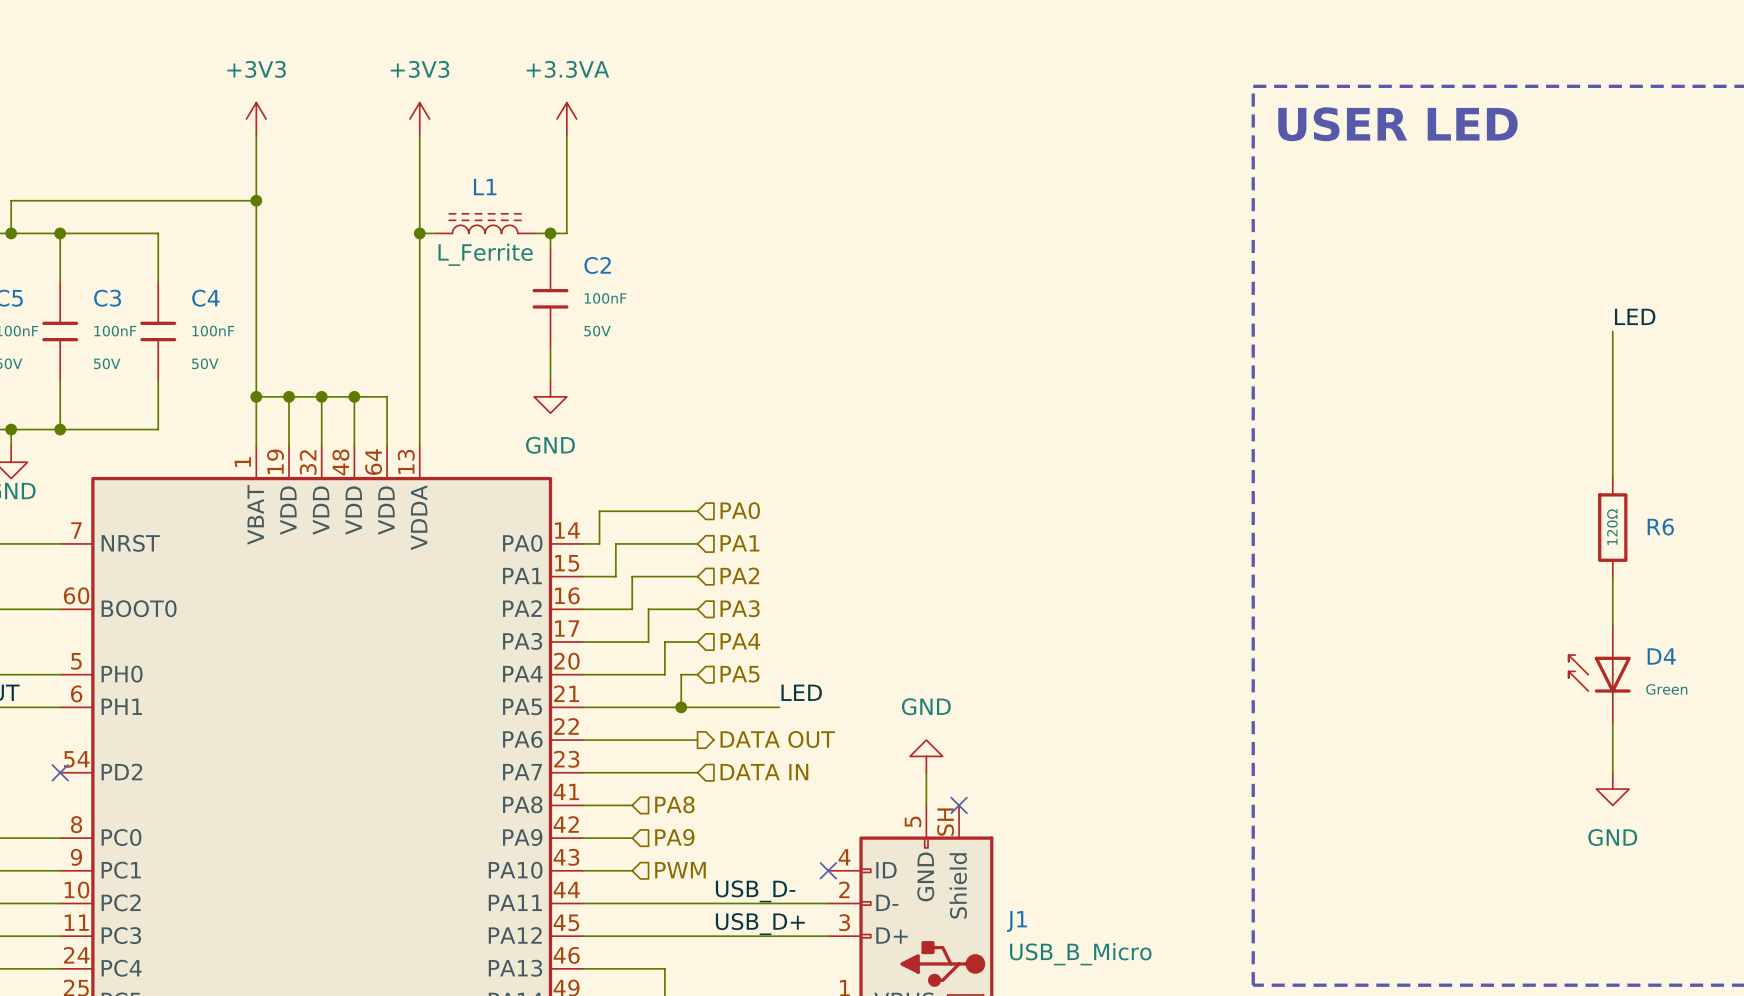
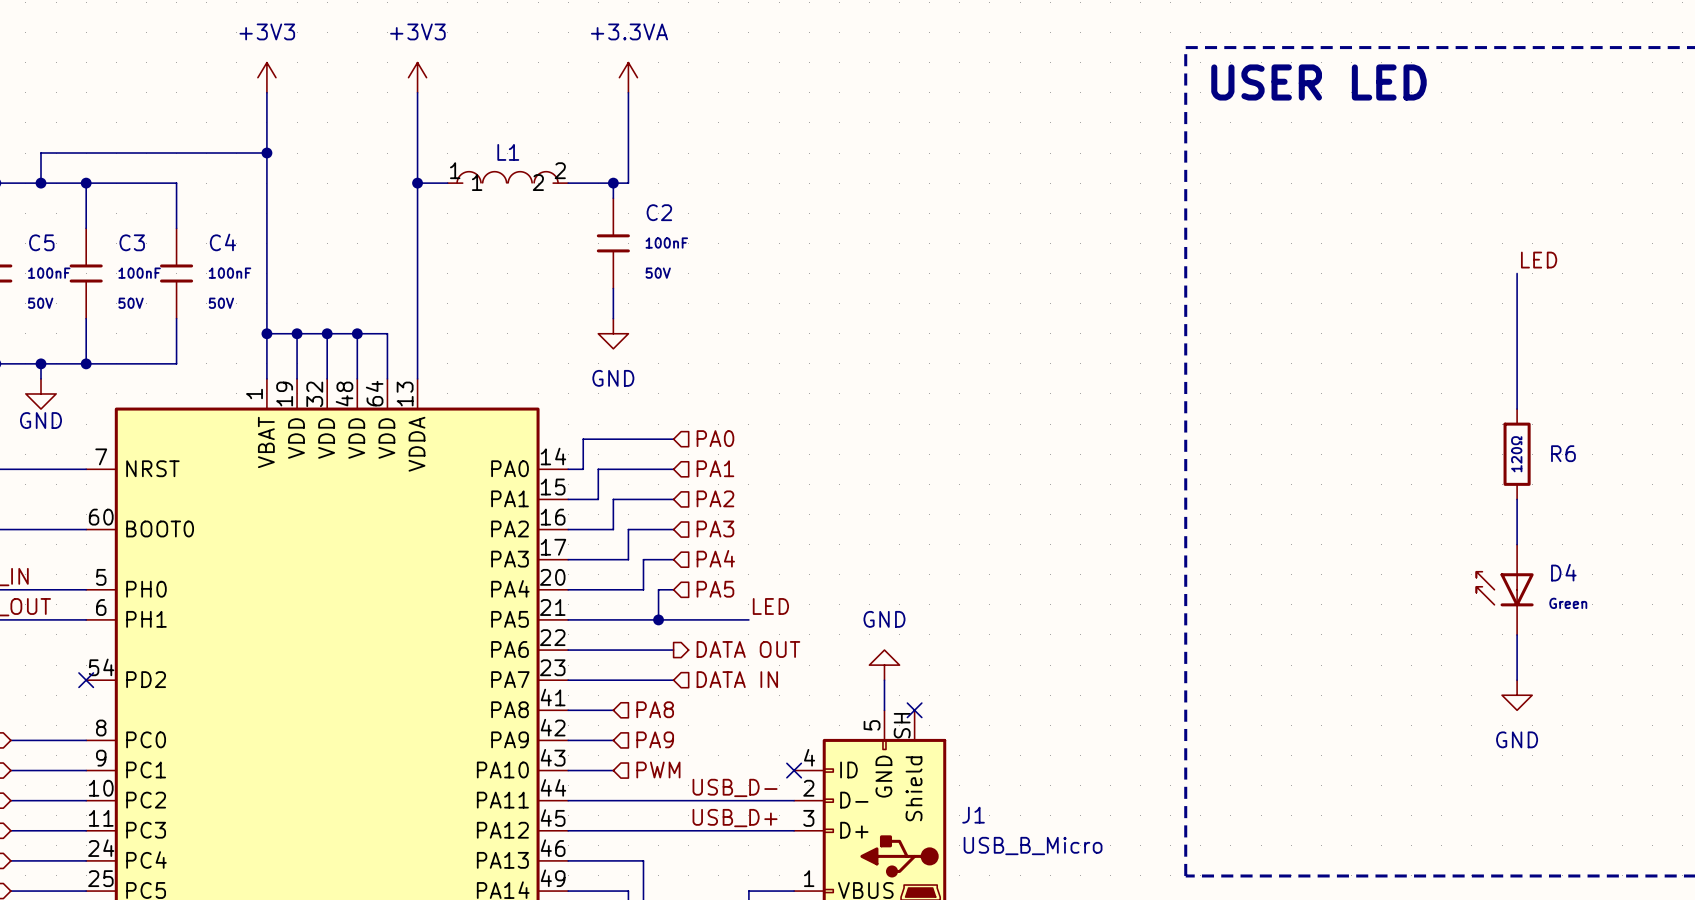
power symbol position: +3.3VA (566, 119) -> +3.3VA (628, 77)
wire: (566, 135) (566, 233) (534, 233) -> none
wire: none -> (628, 92) (628, 183) (568, 183)
L1 symbol: [436, 213, 535, 234] -> [447, 171, 569, 184]
wire: (550, 233) (550, 249) -> (613, 183) (613, 198)
junction: (550, 233) -> none
junction: none -> (613, 183)
L1 value: L_Ferrite (485, 254) -> none
C2 position: (550, 298) -> (613, 243)
wire: (550, 347) (550, 380) -> (613, 288) (613, 318)
power symbol position: GND (550, 396) -> GND (613, 333)

